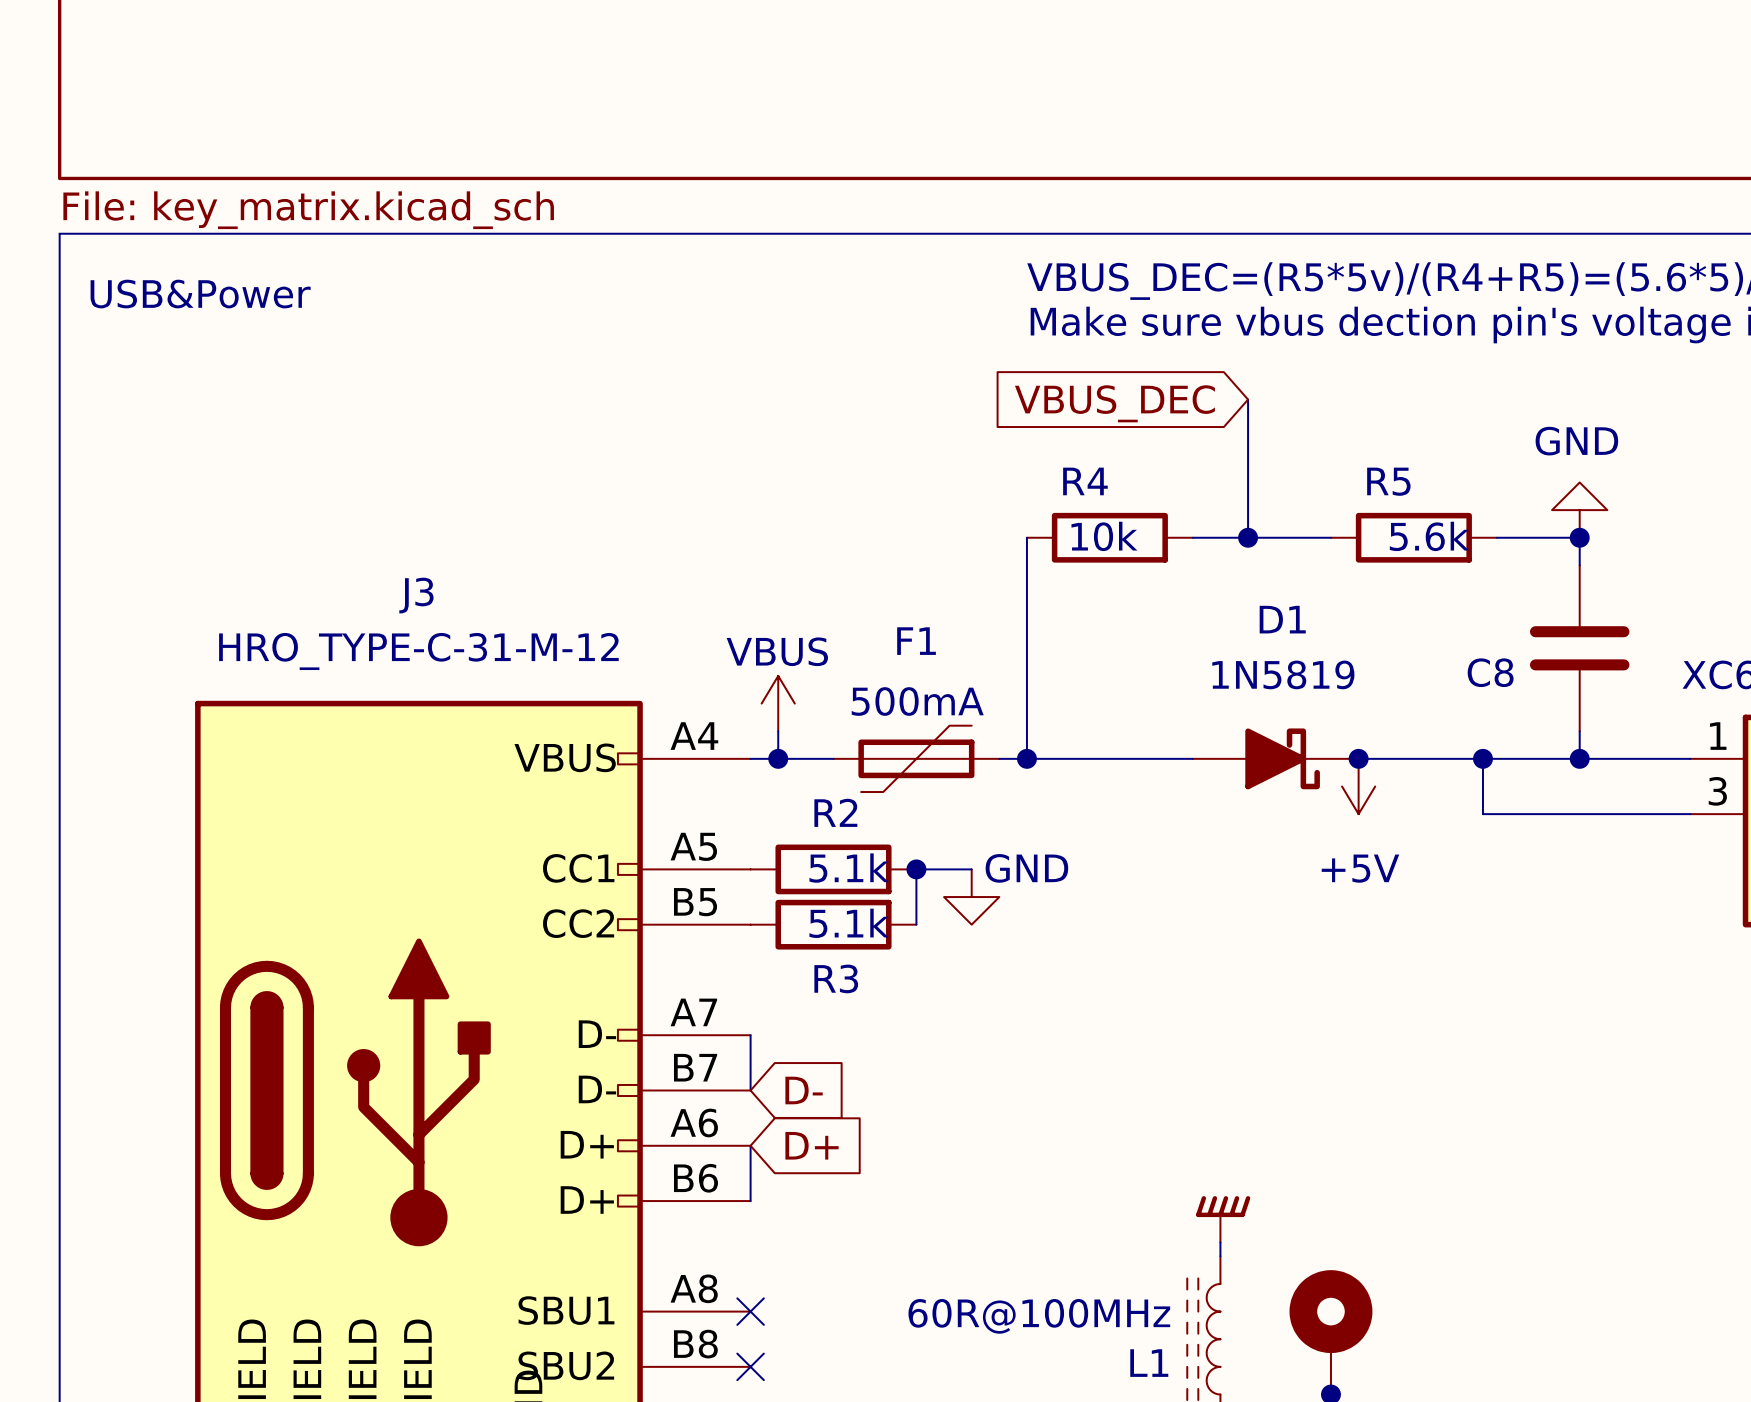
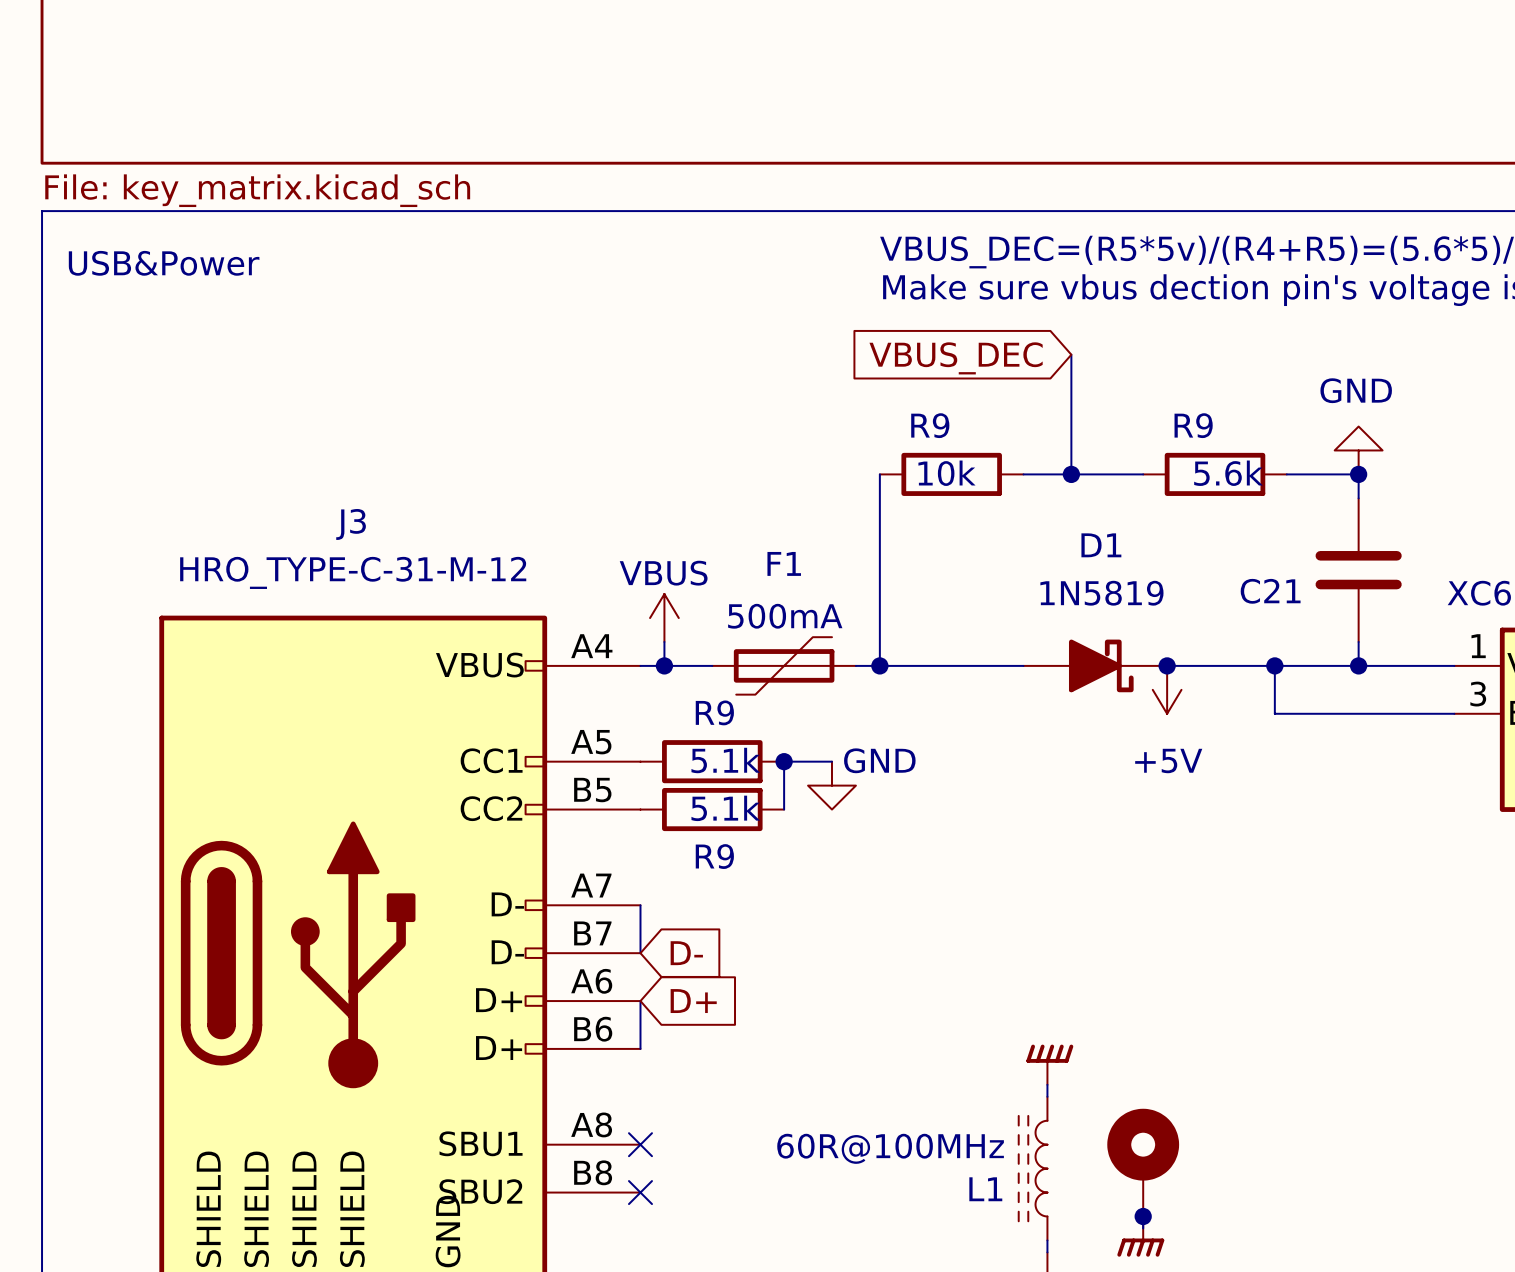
R4 name: R4 (1085, 481) -> R9 (930, 425)
R5 name: R5 (1388, 481) -> R9 (1193, 425)
C8 name: C8 (1490, 672) -> C21 (1270, 591)
R2 name: R2 (835, 812) -> R9 (714, 712)
R3 name: R3 (836, 978) -> R9 (714, 856)

